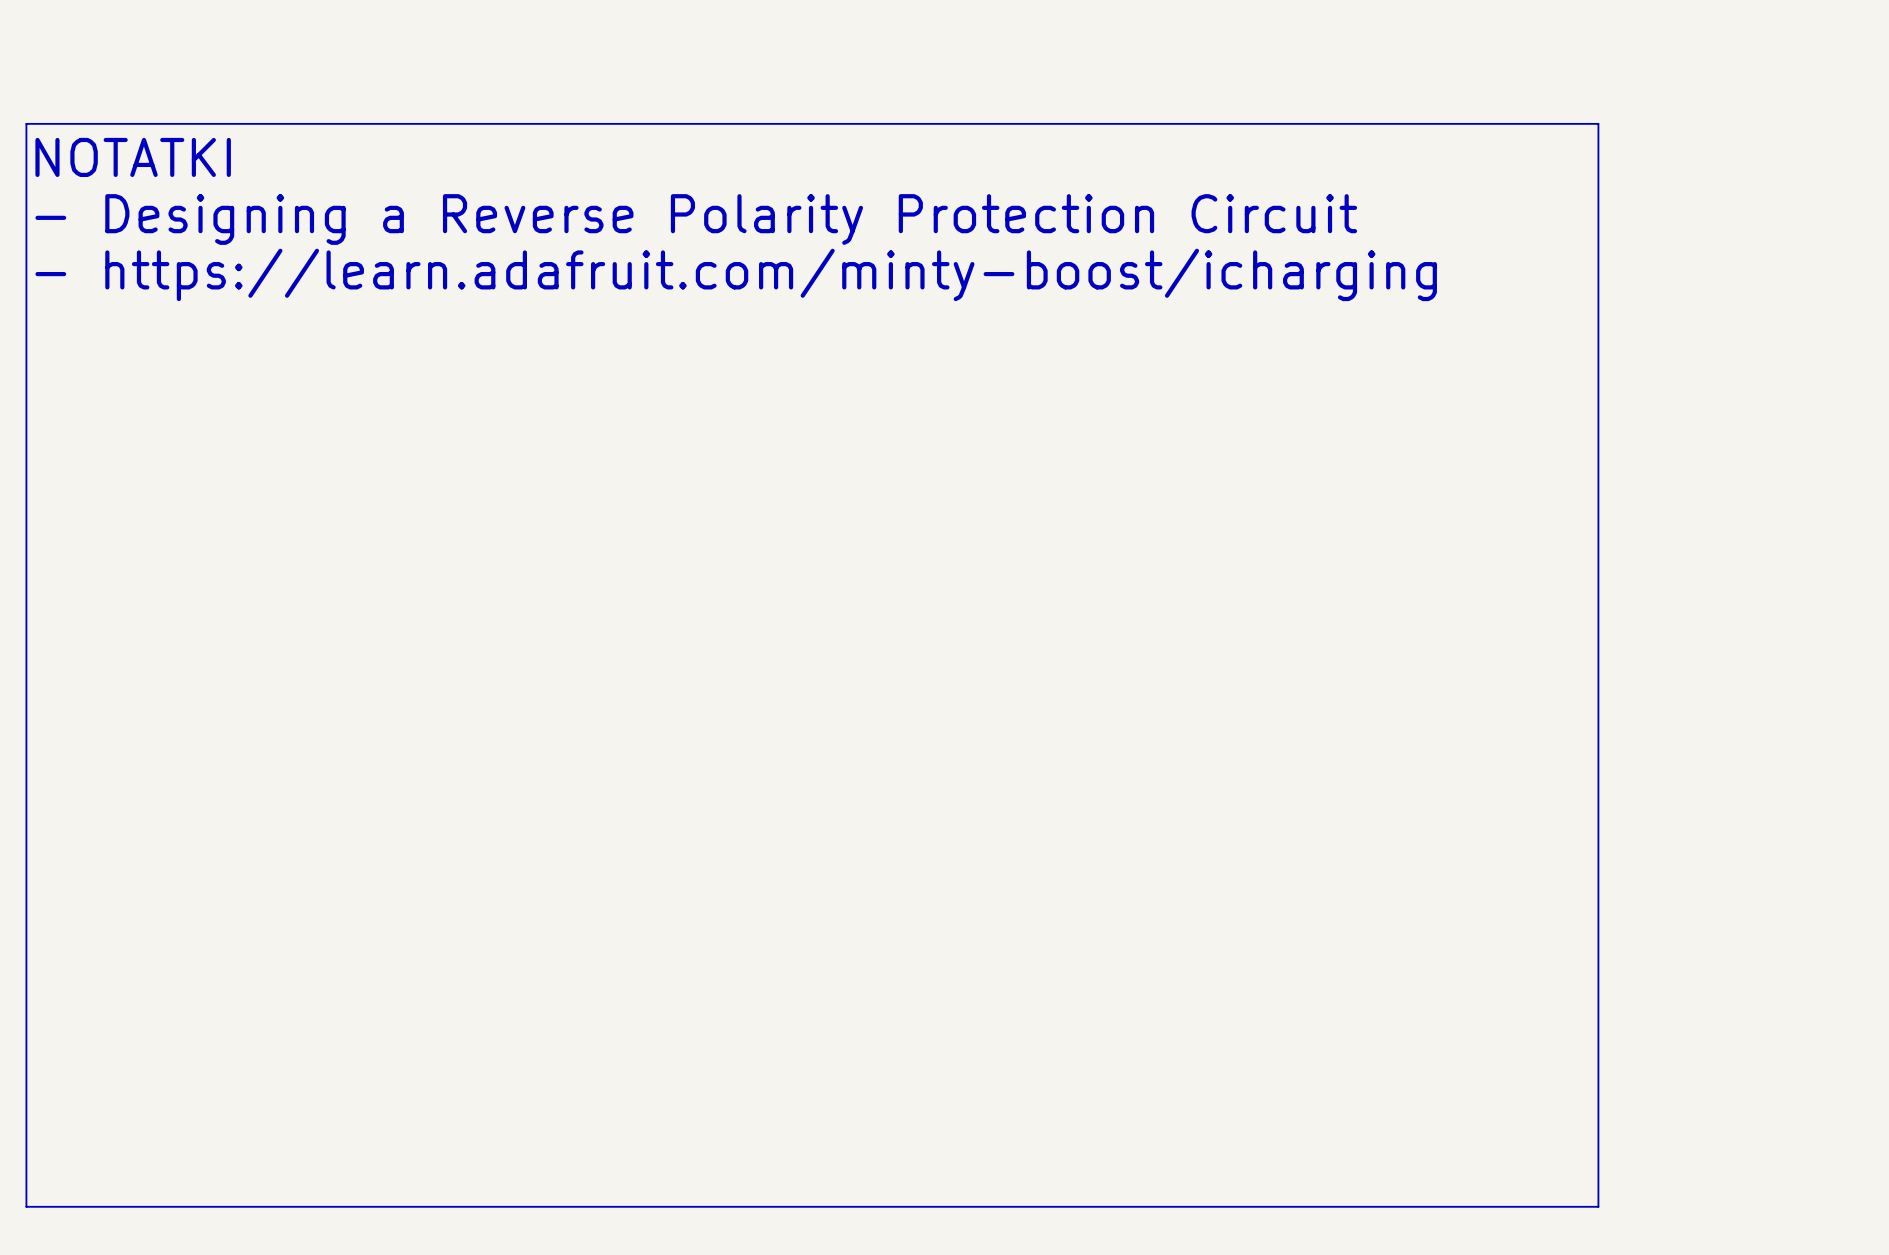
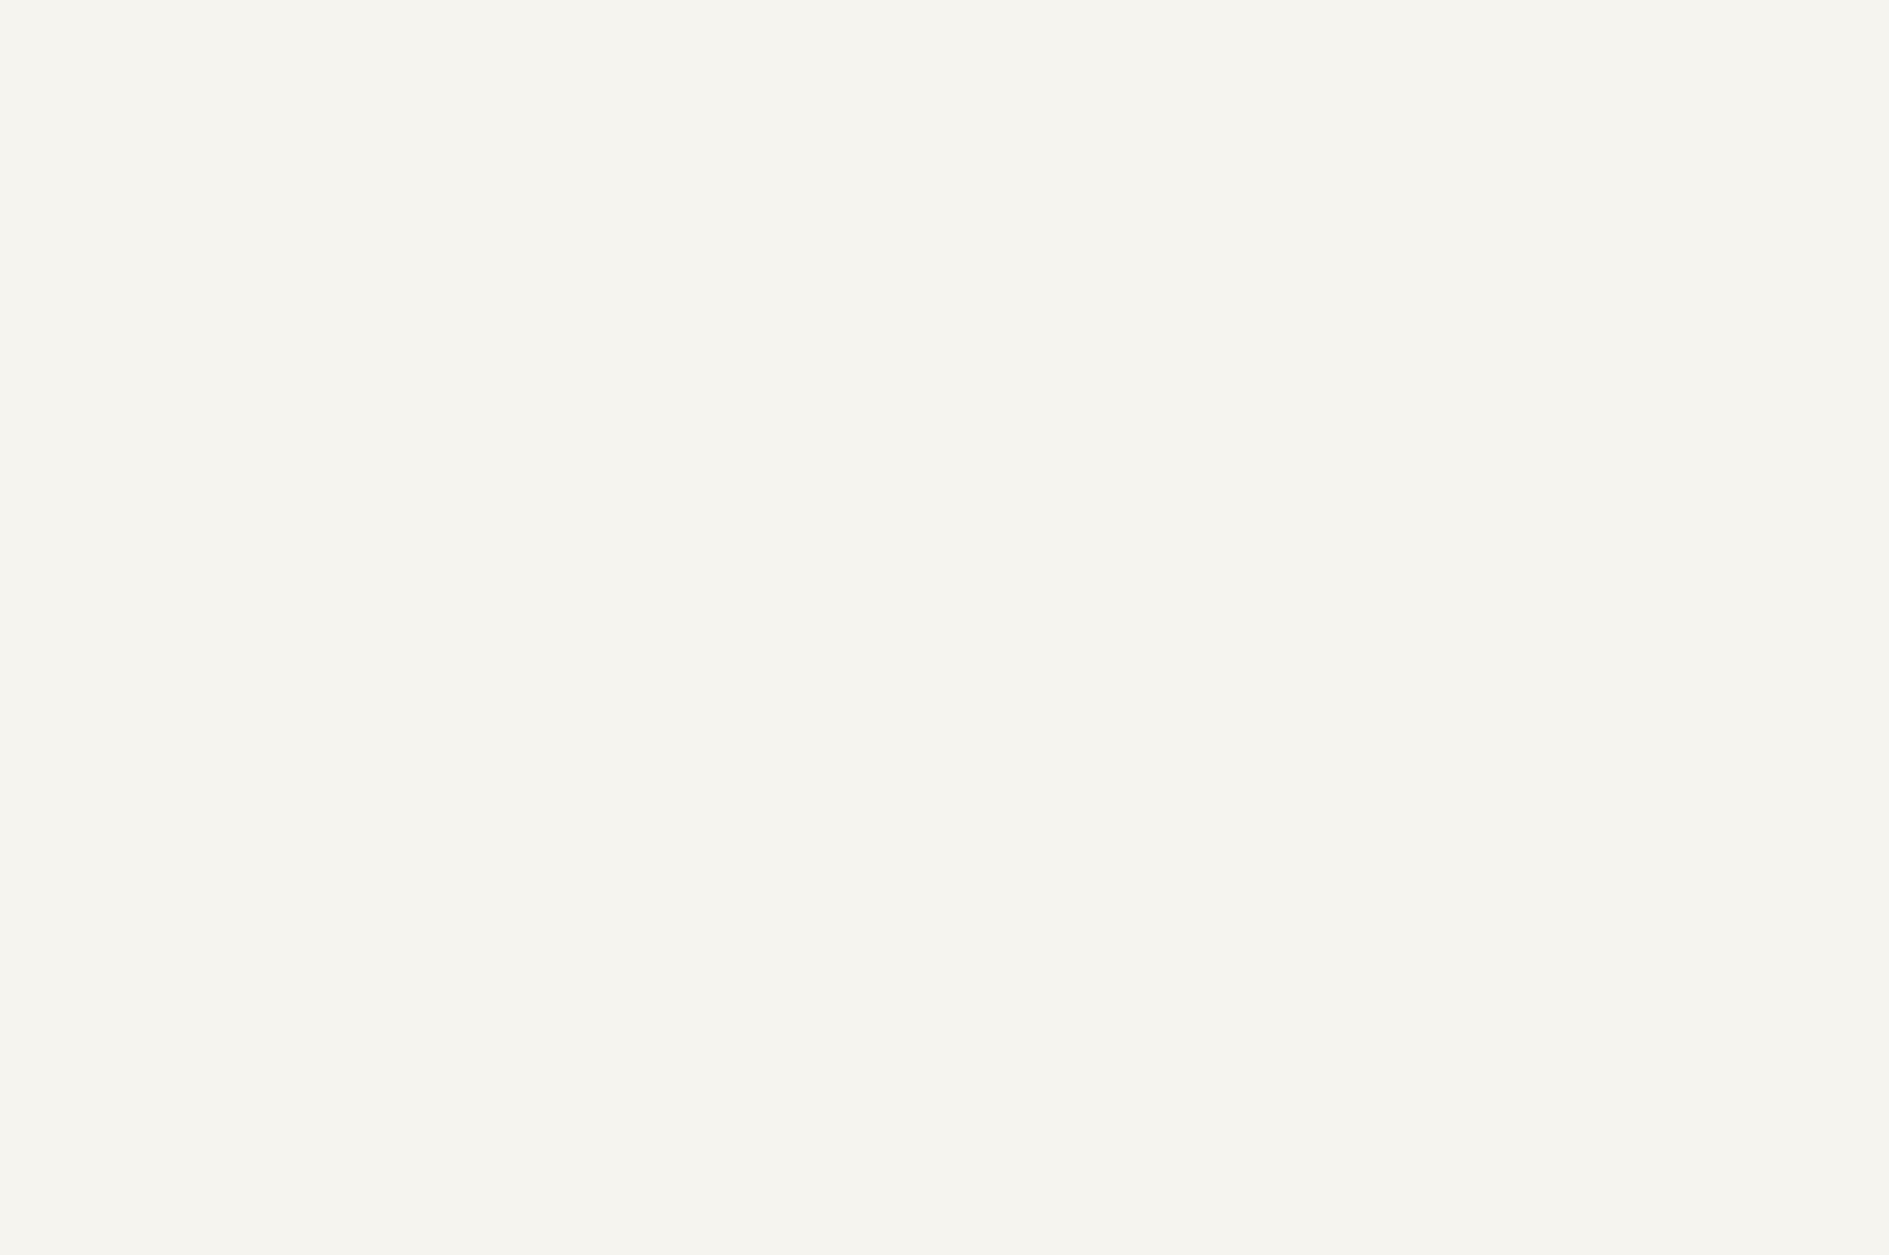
line: (26, 123) (1598, 123) (1598, 1206) (26, 1206) (26, 123) -> none
text: NOTATKI (133, 157) -> none
text: - Designing a Reverse Polarity Protection Circuit (696, 219) -> none
text: - https://learn.adafruit.com/minty-boost/icharging (736, 274) -> none

